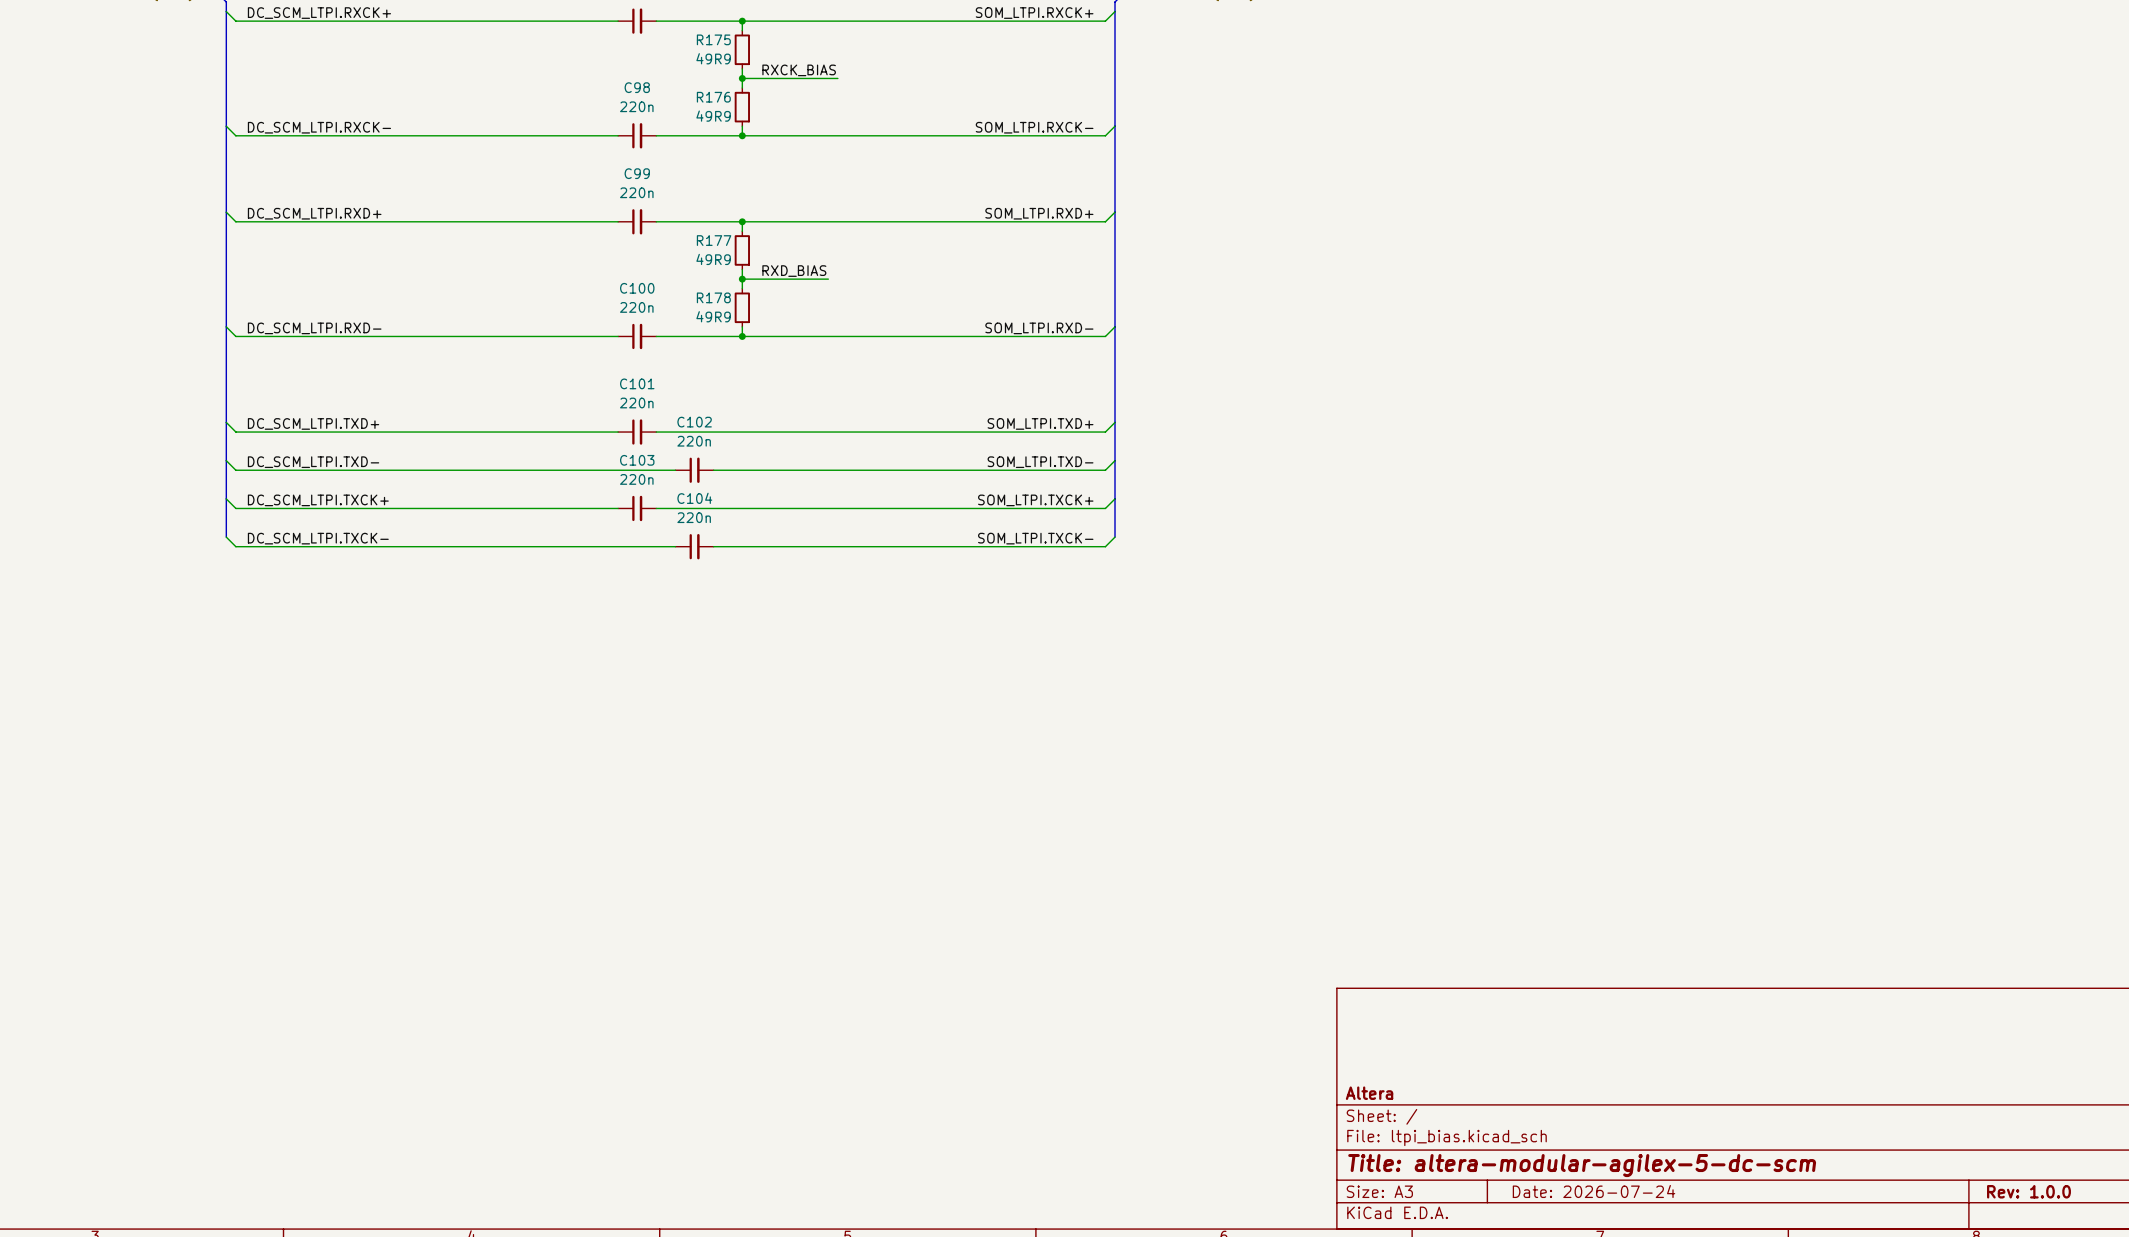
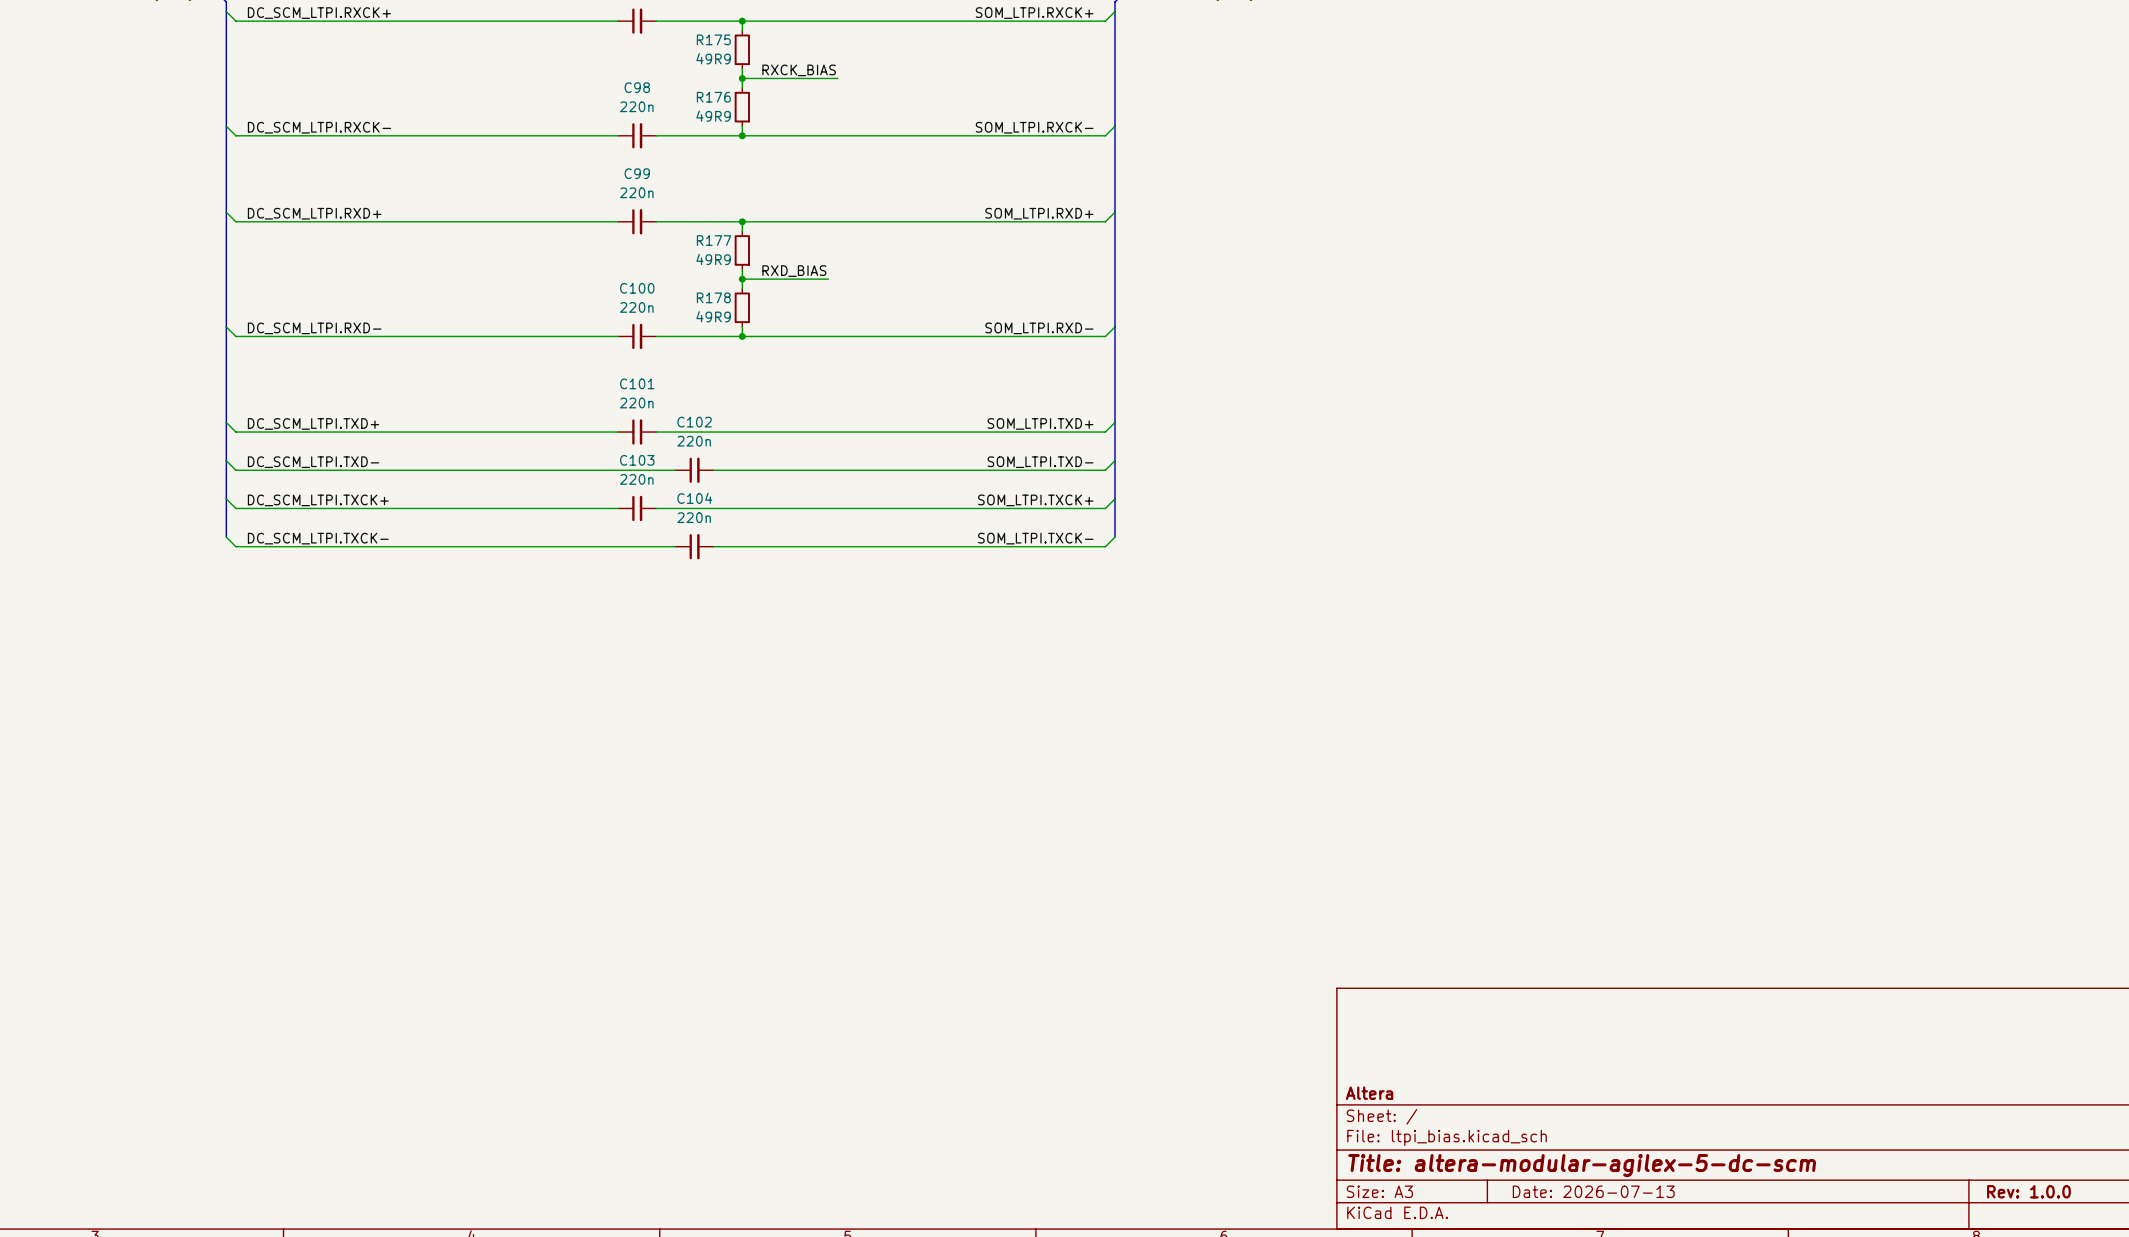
title block: Date: 2026-07-24 (1594, 1191) -> Date: 2026-07-13 (1593, 1191)

